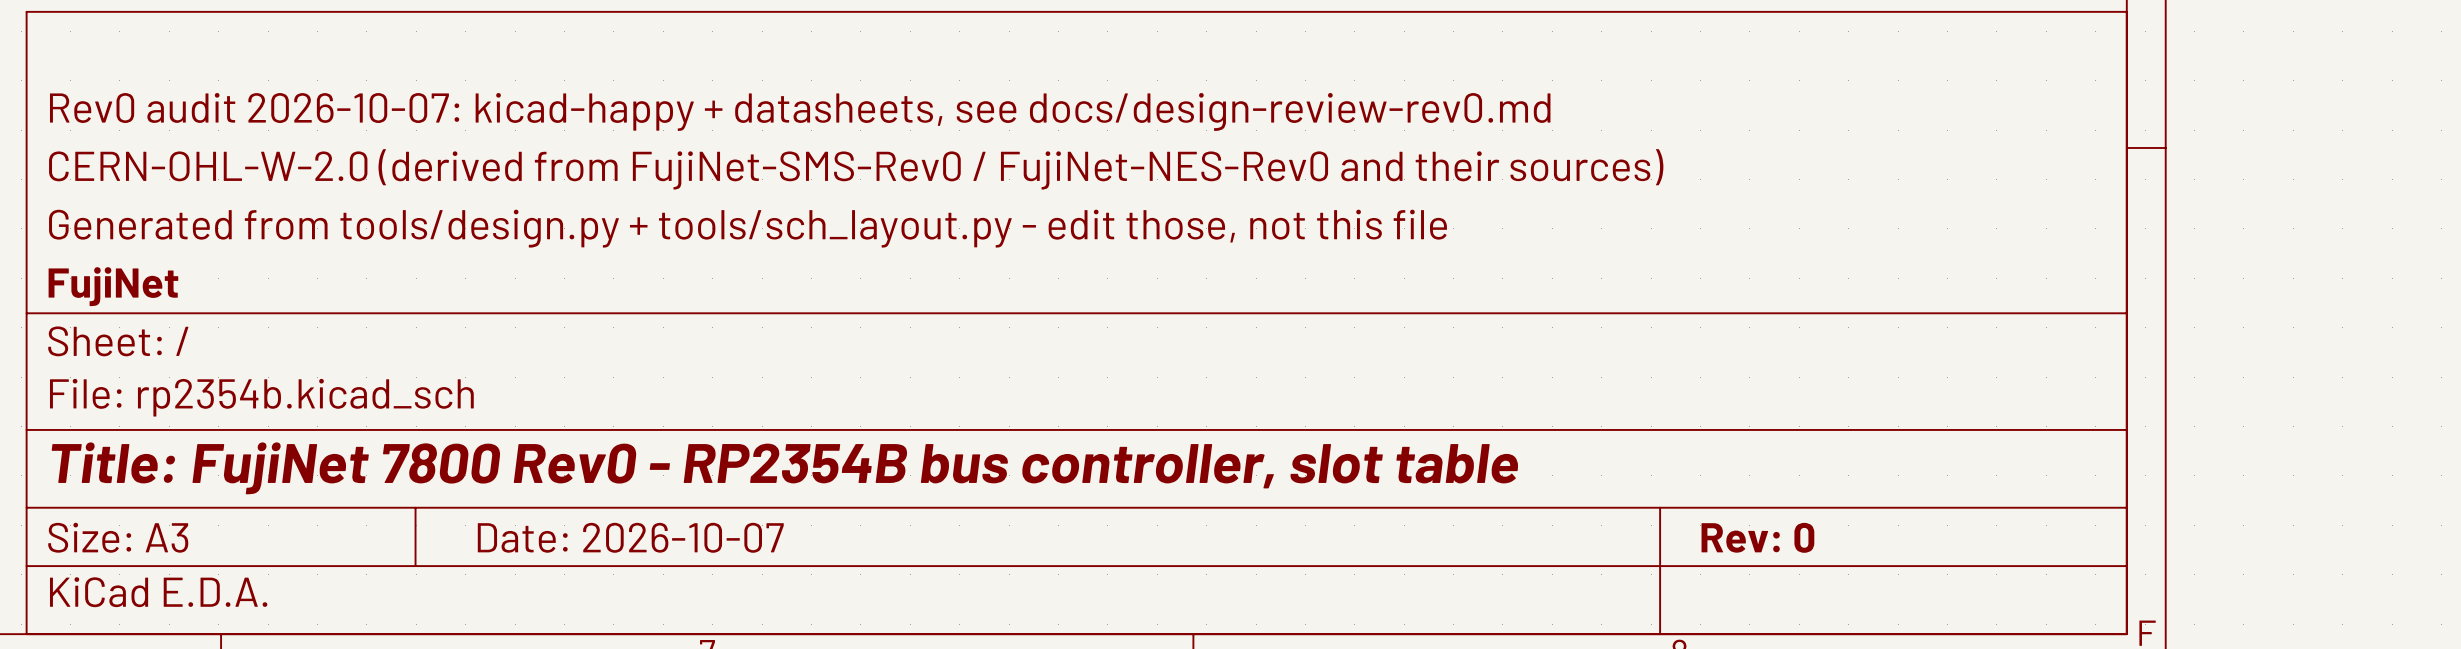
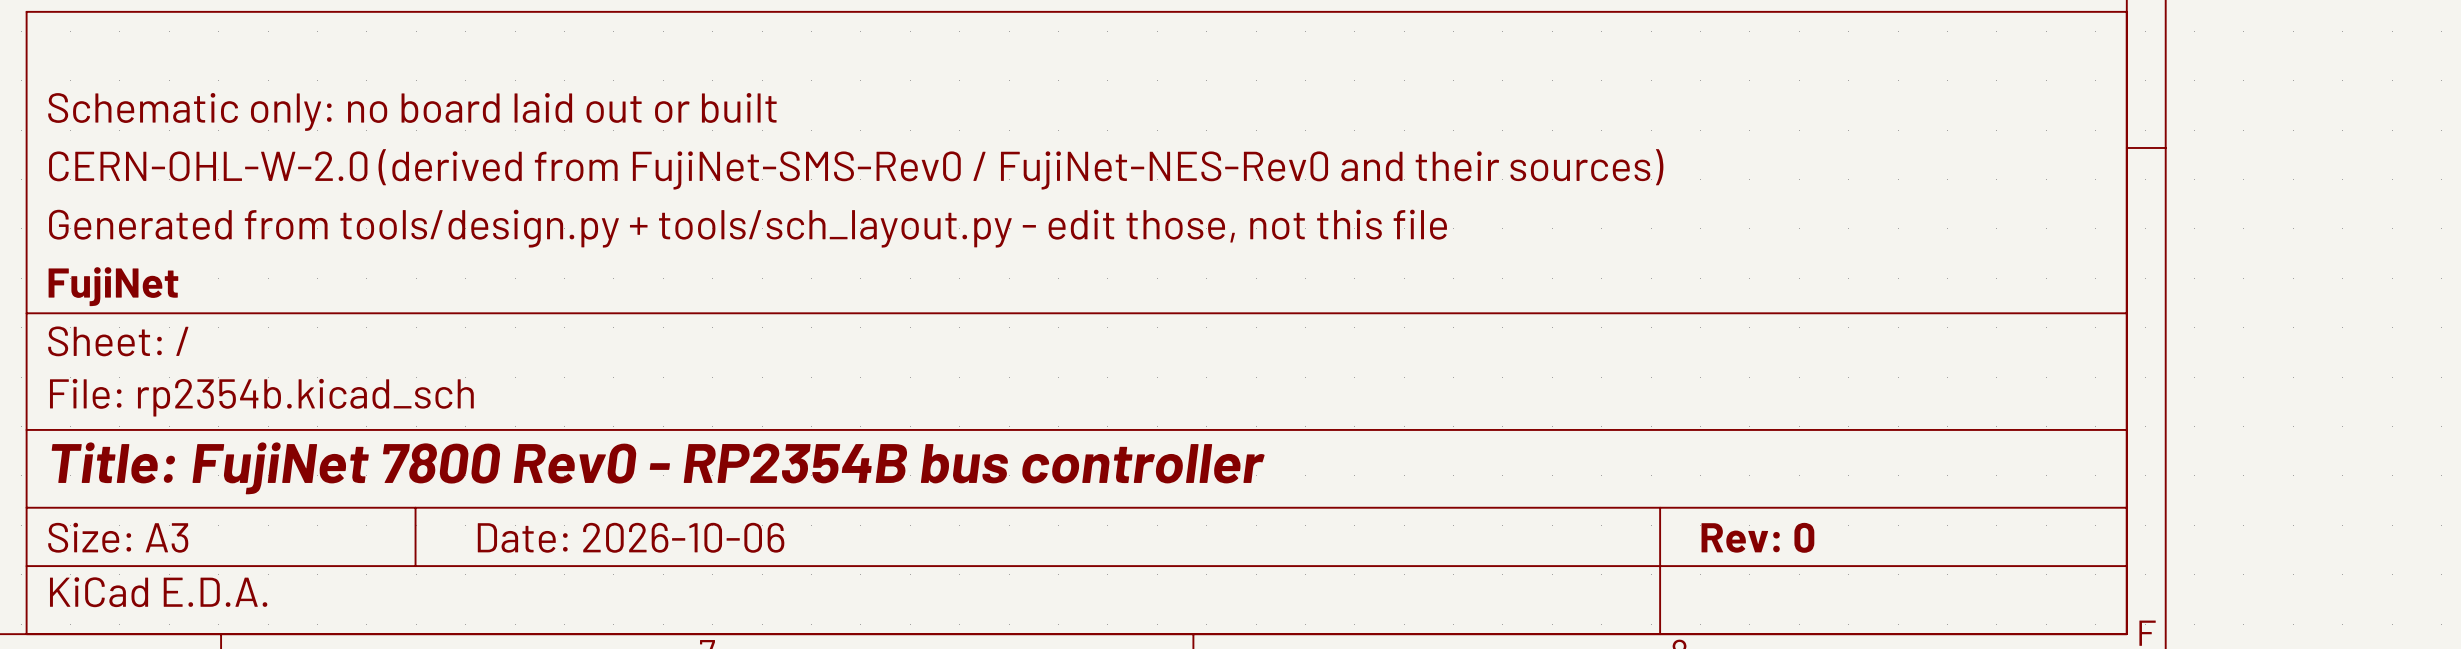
title block: Rev0 audit 2026-10-07: kicad-happy + datasheets, see docs/design-review-rev0.md (800, 111) -> Schematic only: no board laid out or built (412, 111)
title block: Title: FujiNet 7800 Rev0 - RP2354B bus controller, slot table (784, 468) -> Title: FujiNet 7800 Rev0 - RP2354B bus controller (658, 468)
title block: Date: 2026-10-07 (630, 537) -> Date: 2026-10-06 (631, 537)

